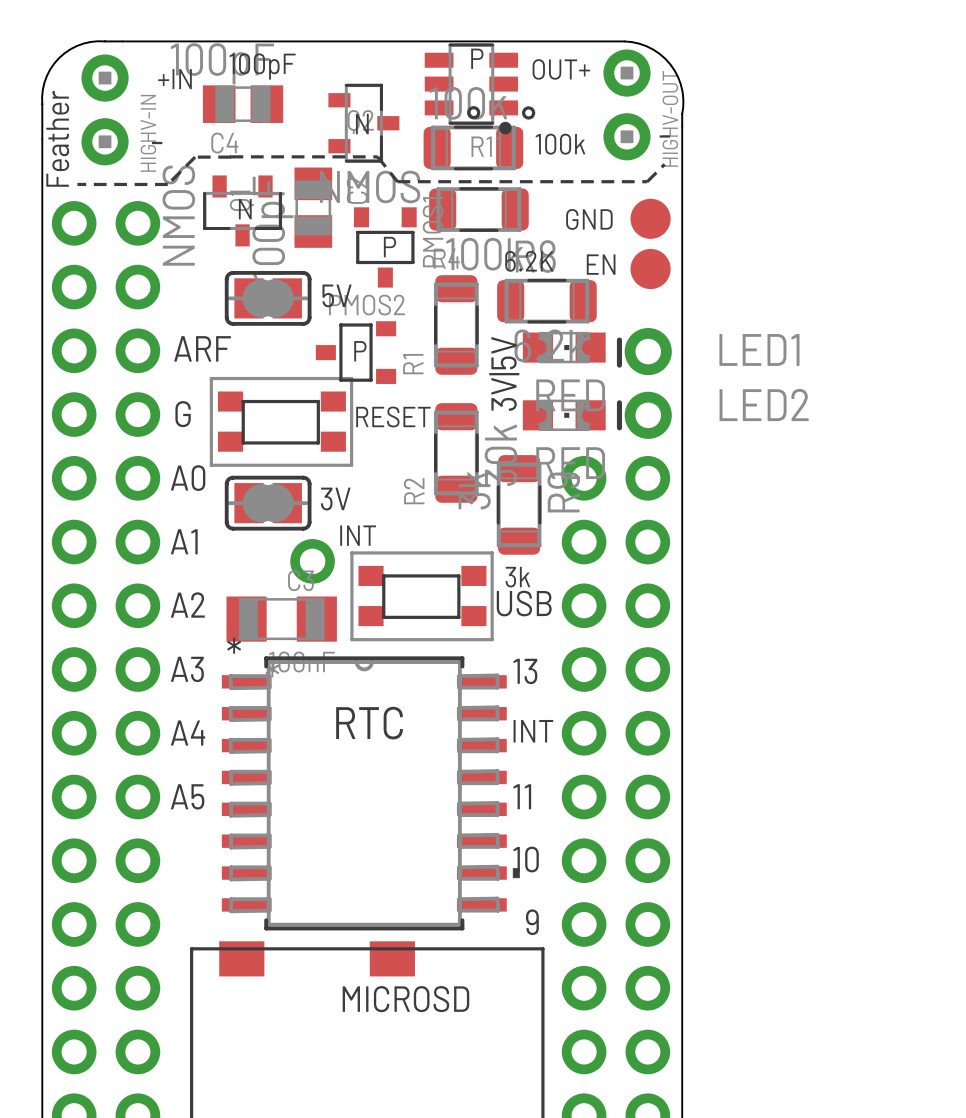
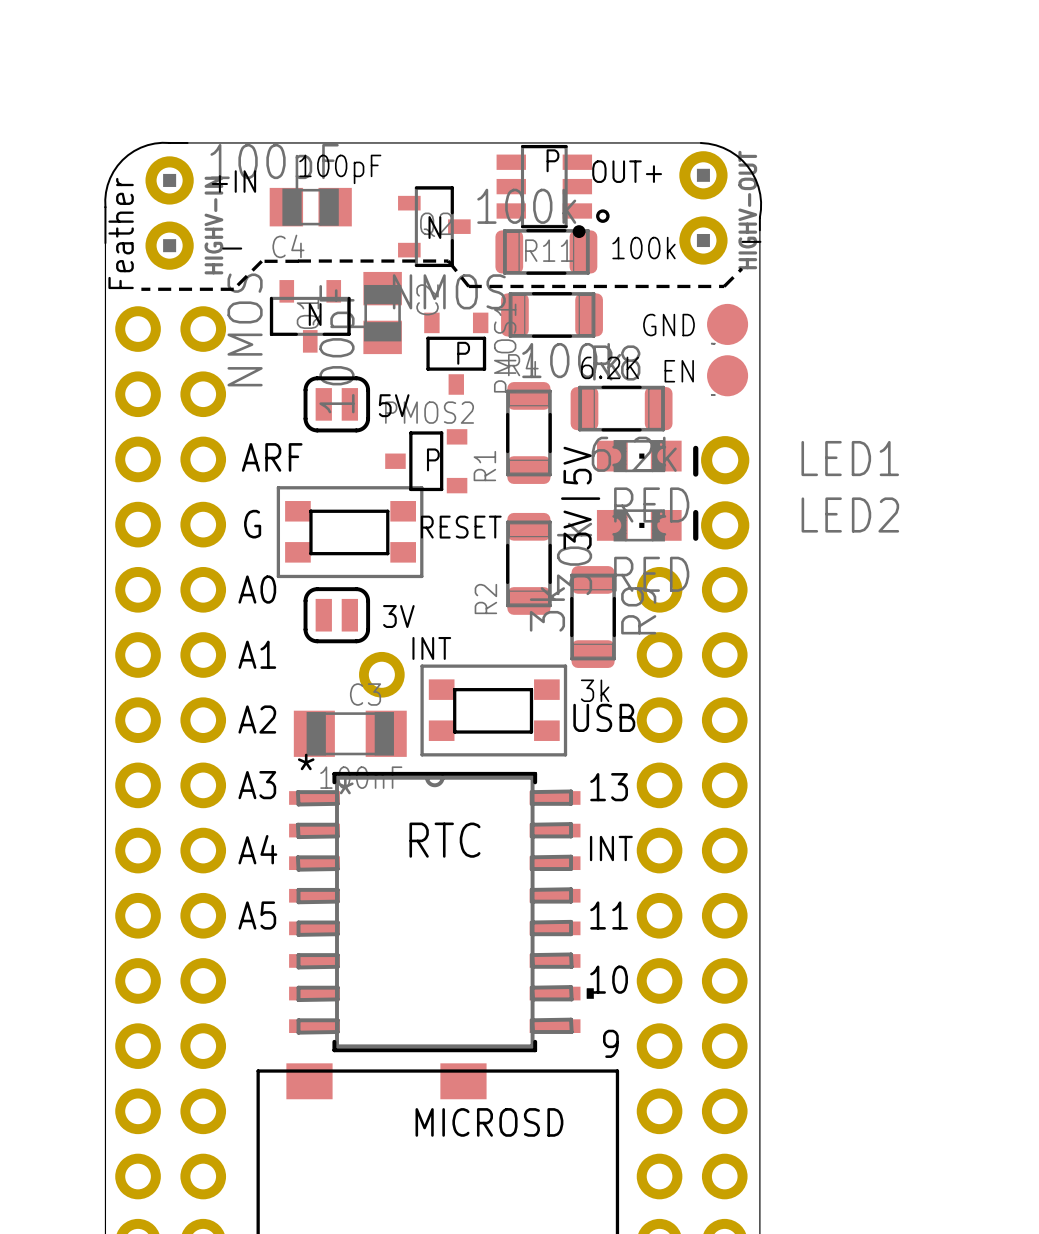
drawing: [467, 106, 481, 120] -> none
5V footprint: [224, 270, 312, 326] -> [303, 376, 371, 433]
3V footprint: [224, 475, 312, 531] -> [303, 587, 371, 644]

